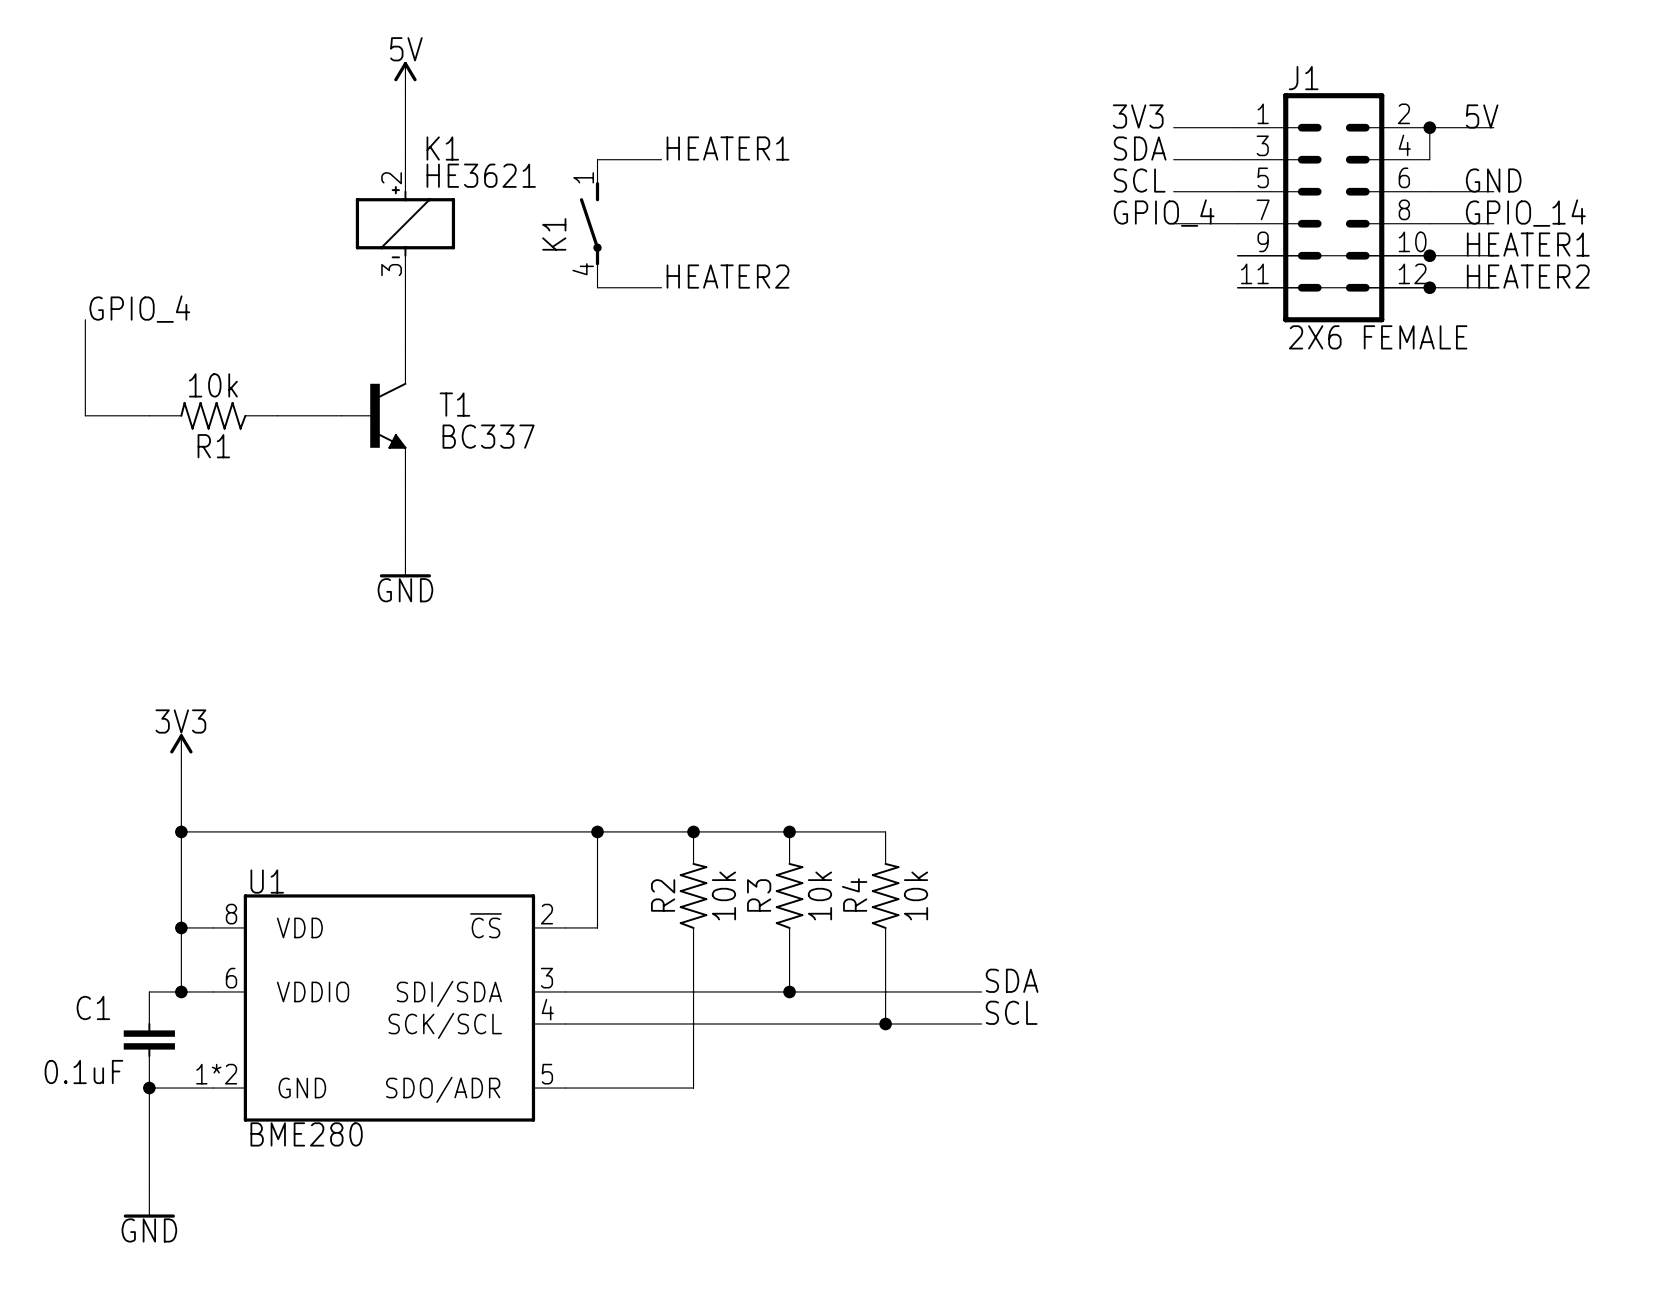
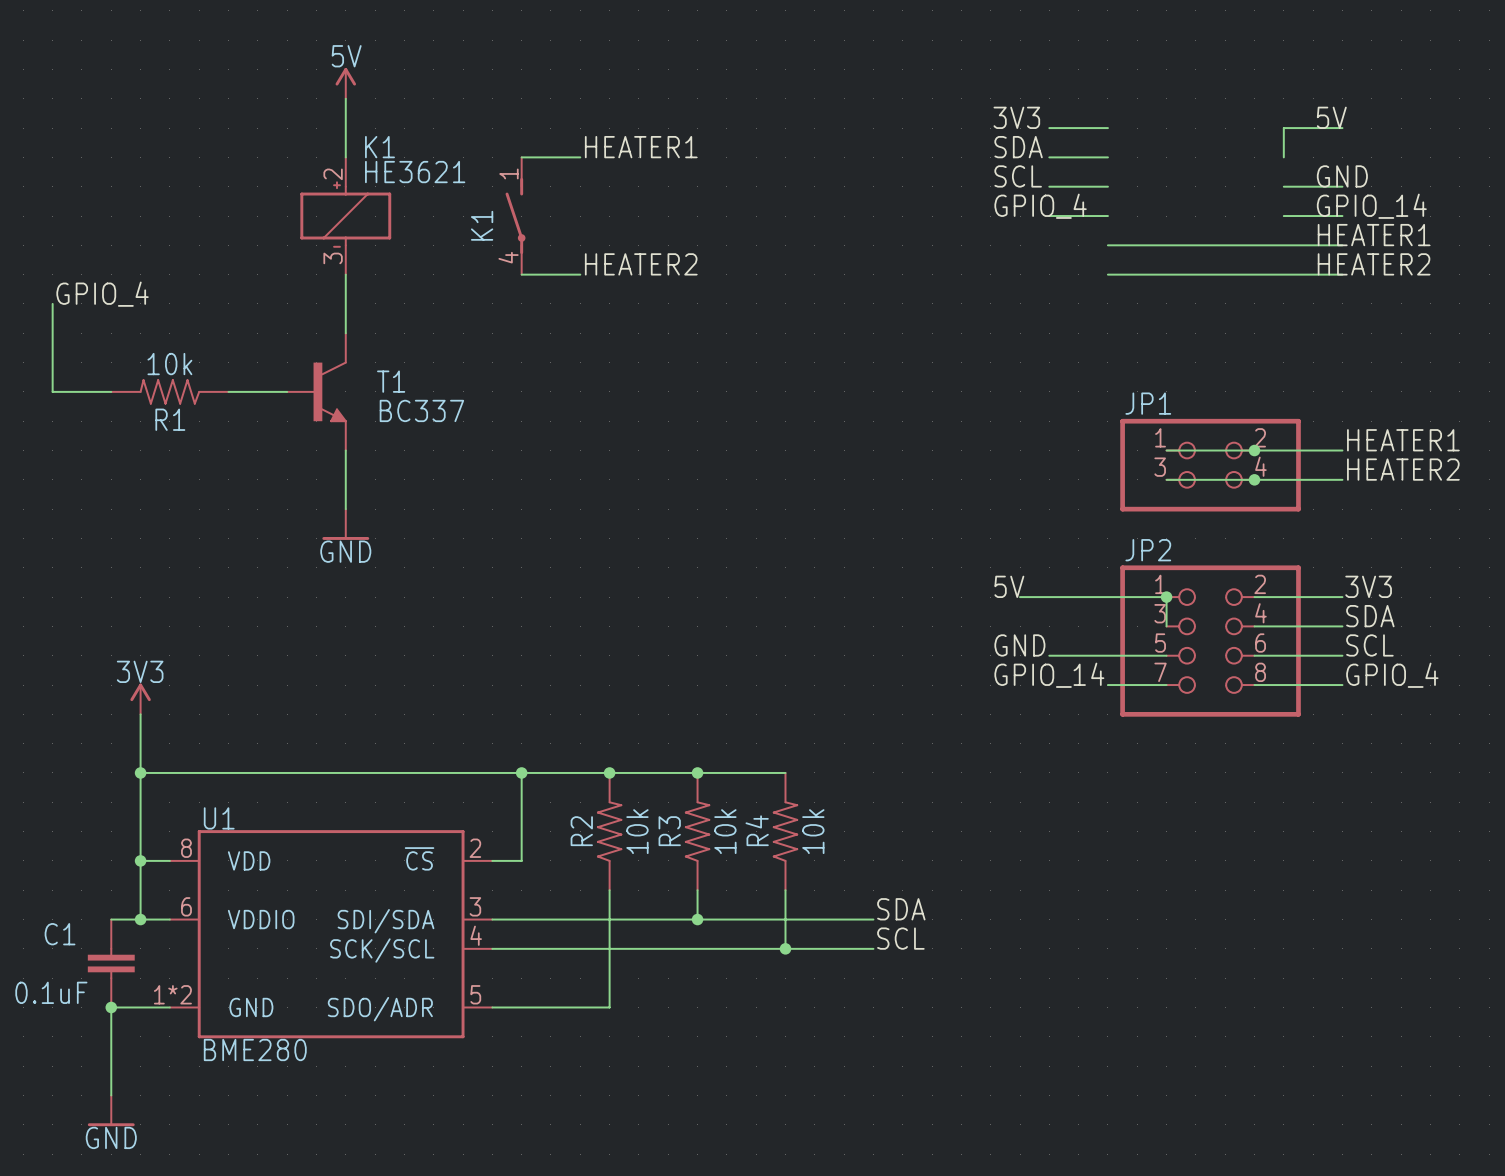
junction: (1429, 127) -> none
J1: 2X6 FEMALE (1333, 207) -> none
junction: (1429, 255) -> none
junction: (1429, 287) -> none
label: none -> HEATER1 (1403, 440)
wire: none -> (1166, 450) (1342, 450)
junction: none -> (1254, 450)
JP1: none -> (1210, 465)
label: none -> HEATER2 (1403, 469)
wire: none -> (1166, 479) (1342, 479)
junction: none -> (1254, 479)
label: none -> 5V (1009, 586)
label: none -> 3V3 (1368, 586)
wire: none -> (1020, 597) (1166, 597) (1166, 626)
junction: none -> (1166, 597)
wire: none -> (1254, 597) (1342, 597)
label: none -> SDA (1370, 616)
wire: none -> (1254, 626) (1342, 626)
JP2: none -> (1210, 641)
label: none -> GND (1019, 645)
label: none -> SCL (1369, 645)
wire: none -> (1049, 655) (1166, 655)
wire: none -> (1254, 655) (1342, 655)
label: none -> GPIO_14 (1049, 675)
label: none -> GPIO_4 (1392, 675)
wire: none -> (1107, 685) (1166, 685)
wire: none -> (1254, 685) (1342, 685)

